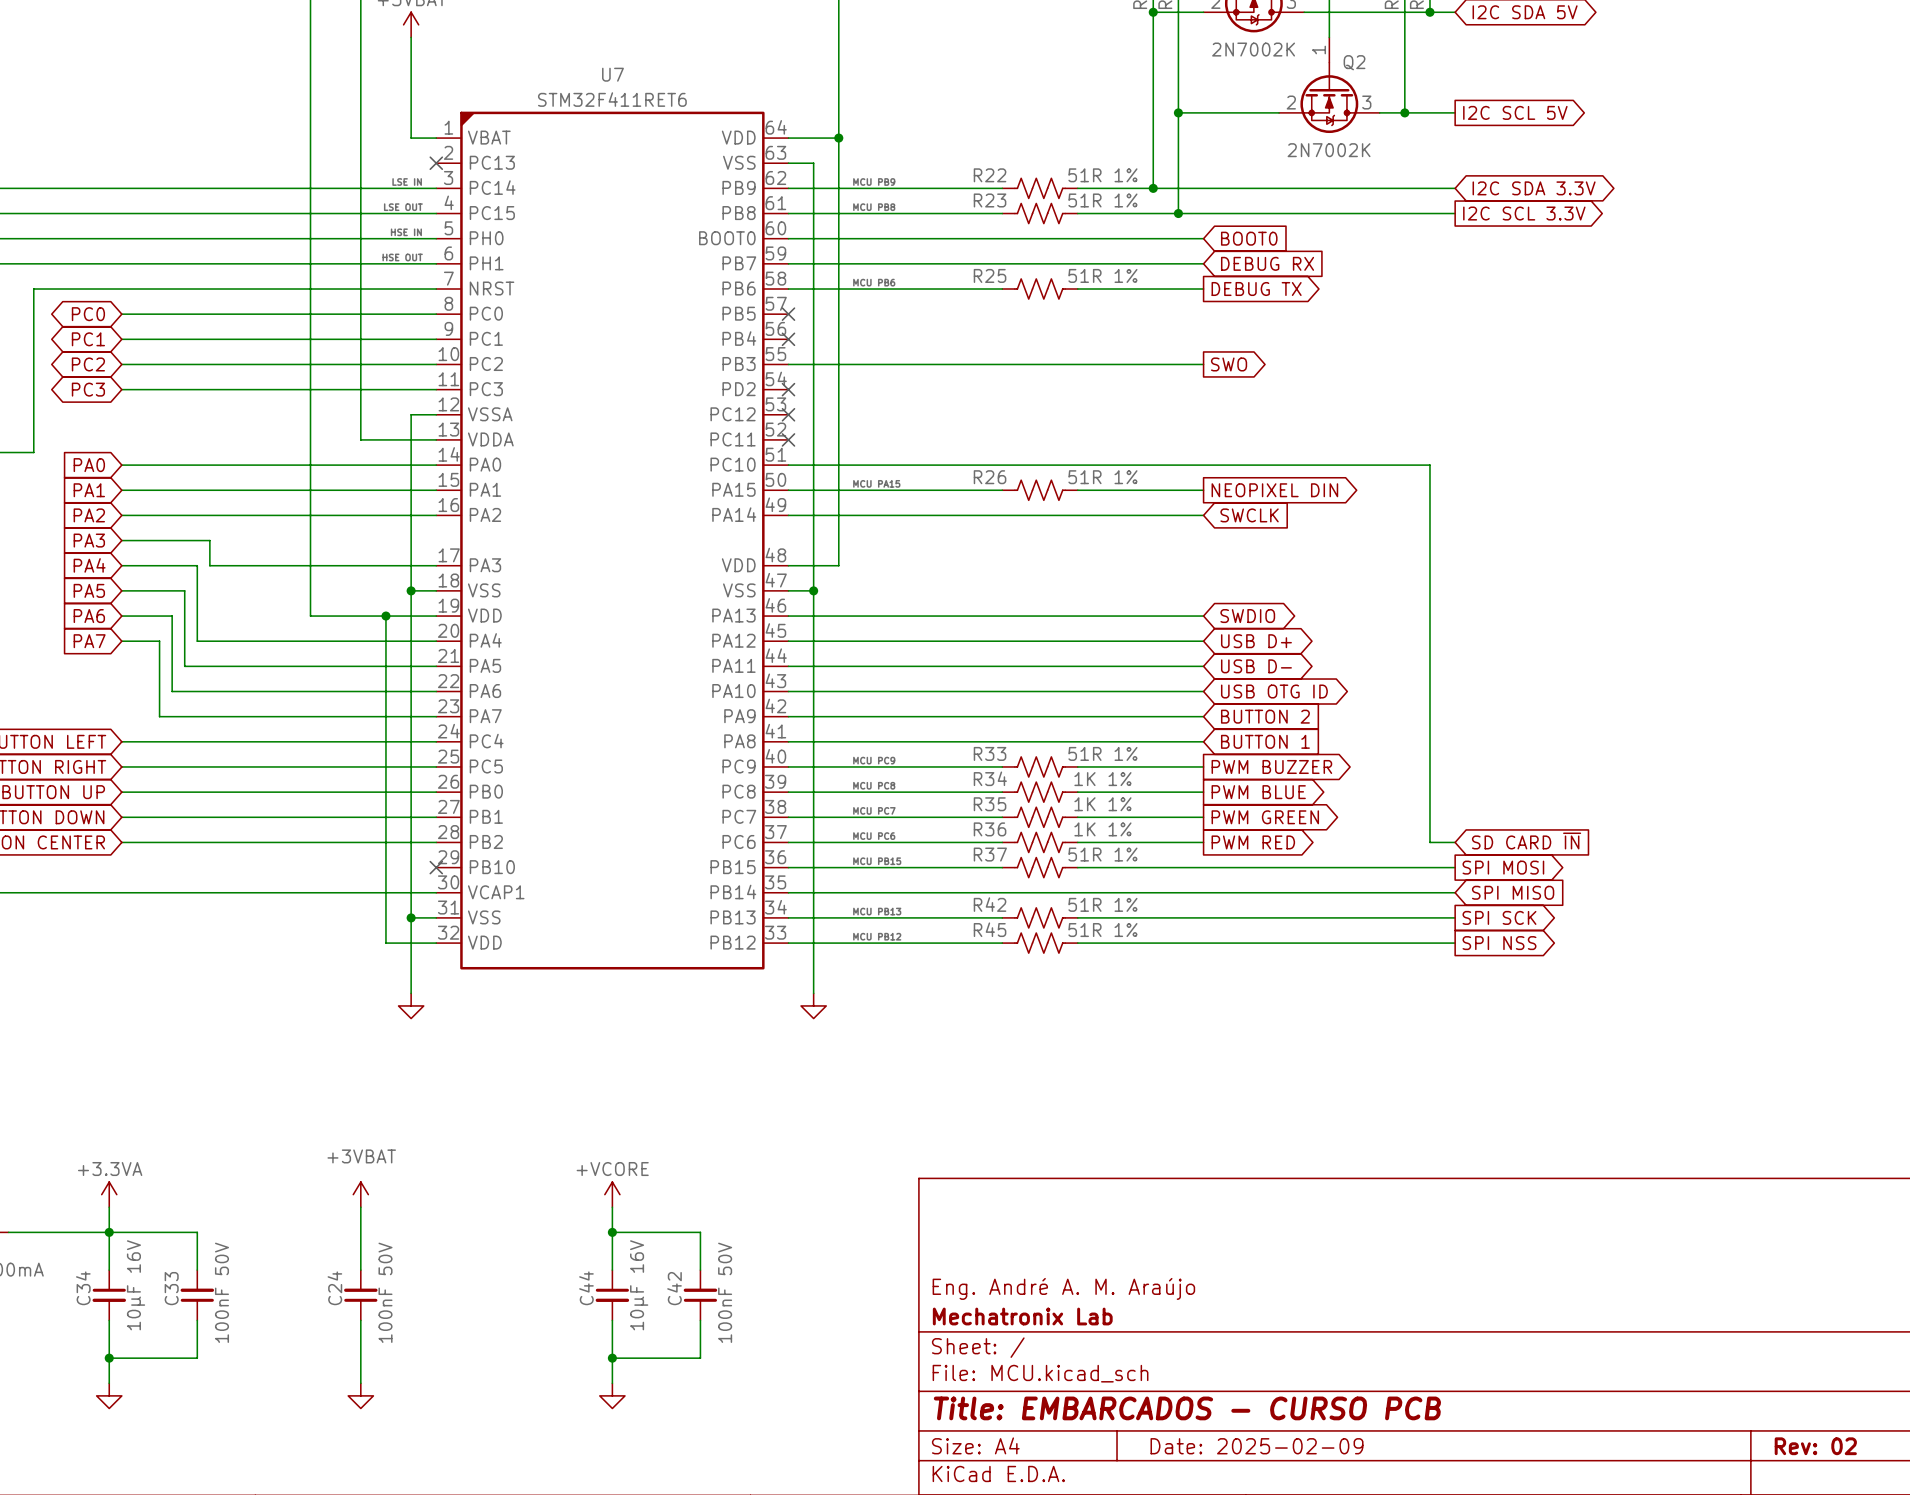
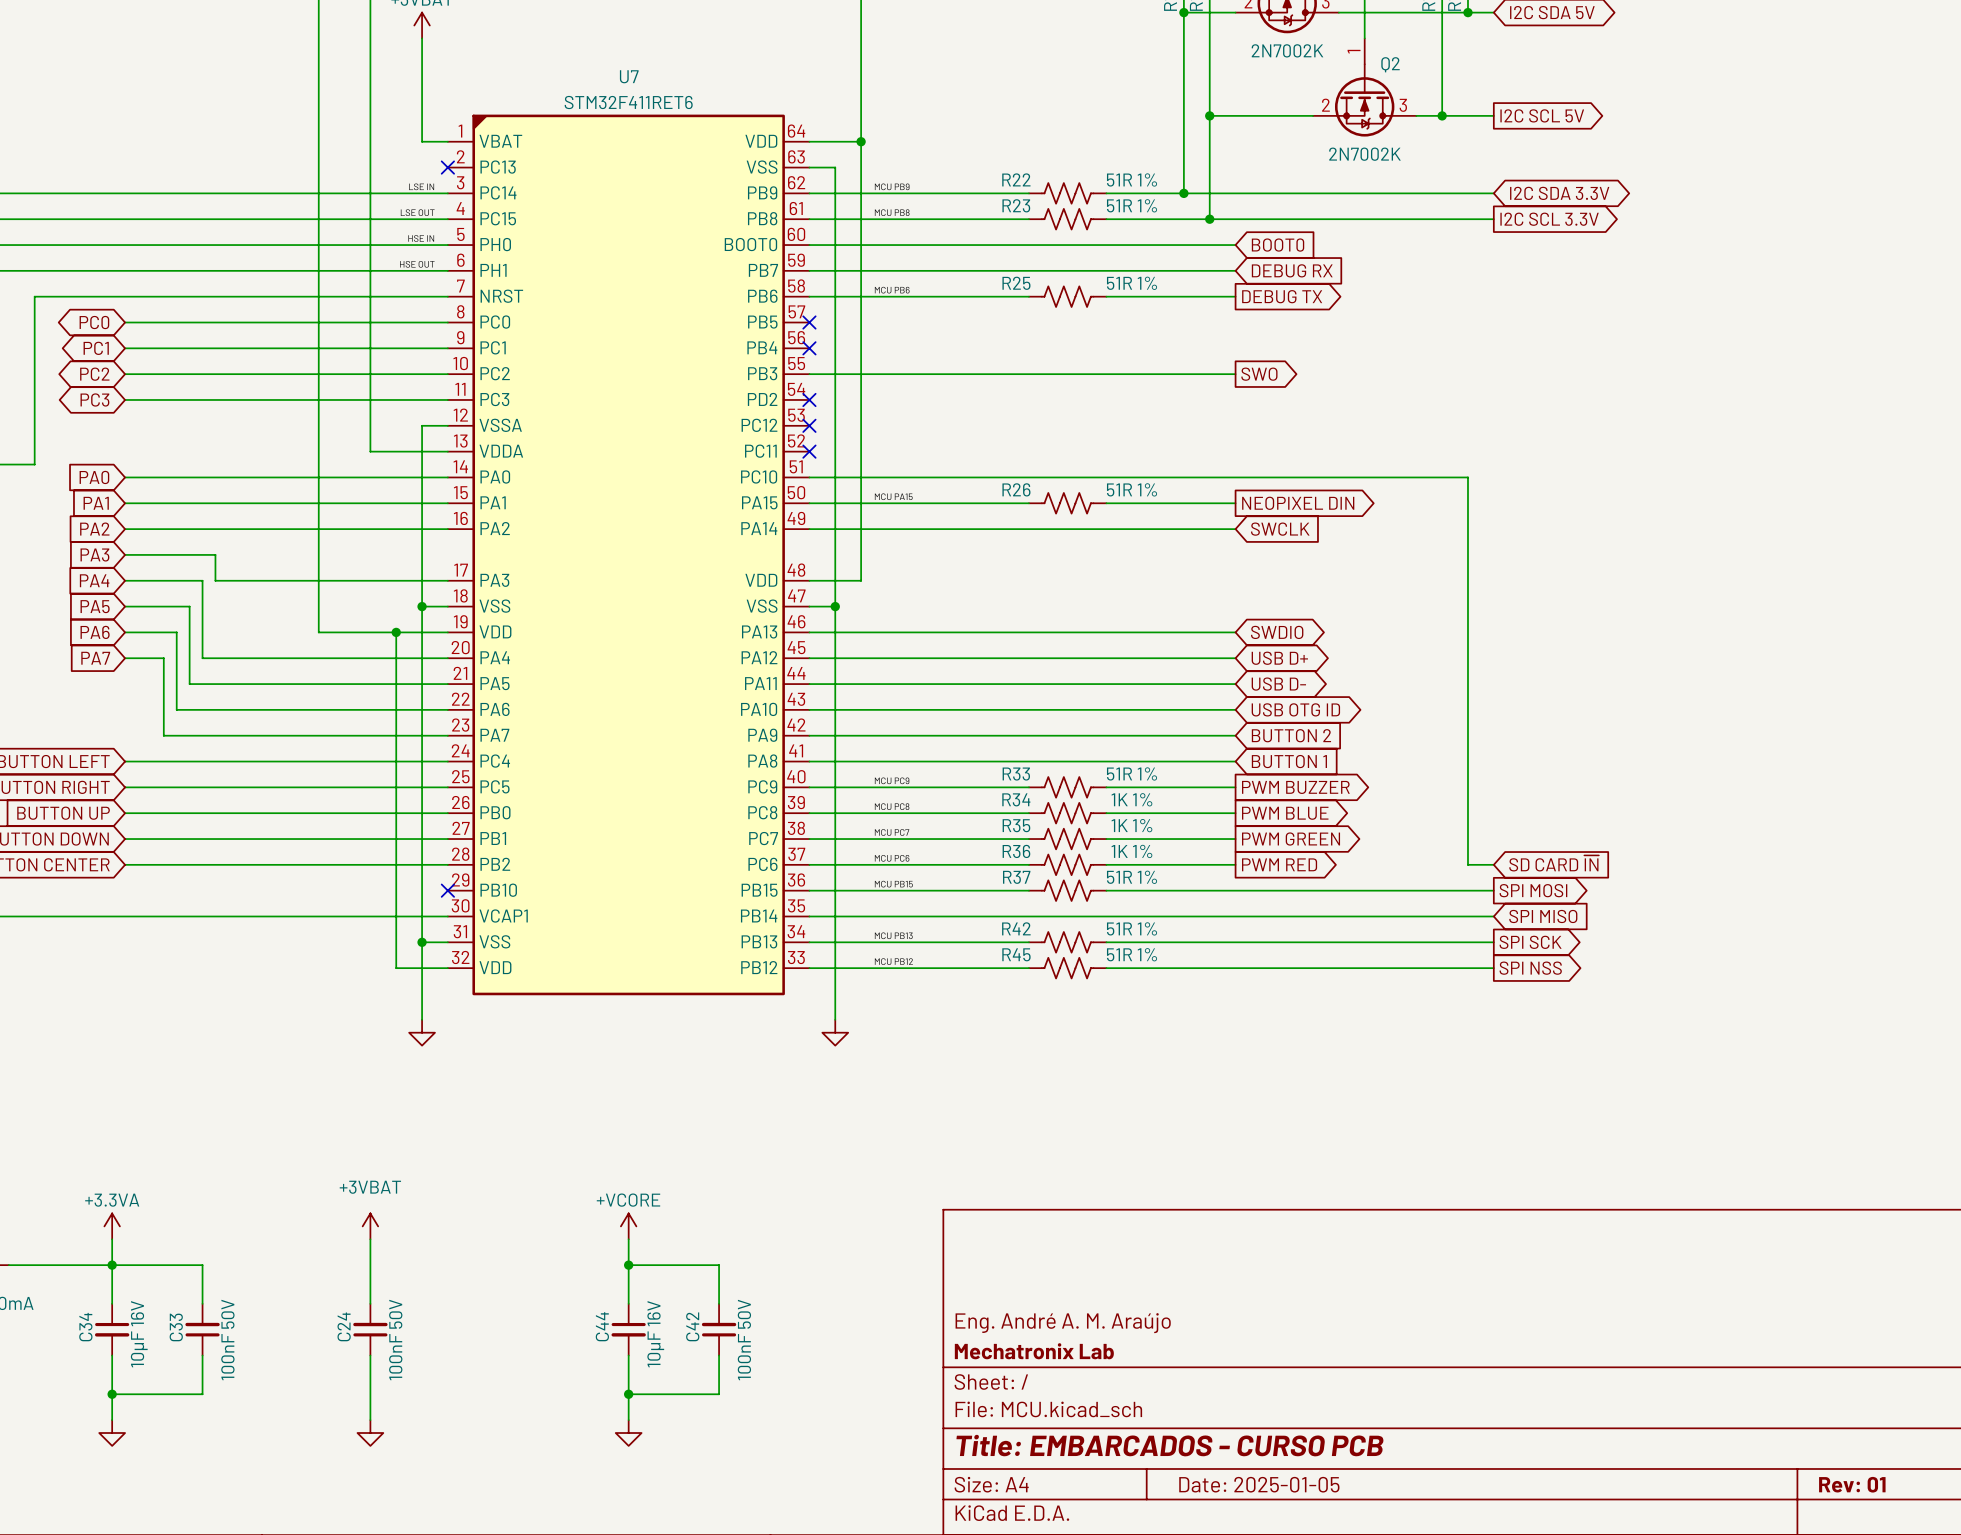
title block: Date: 2025-02-09 (1257, 1446) -> Date: 2025-01-05 (1259, 1484)
title block: Rev: 02 (1815, 1446) -> Rev: 01 (1852, 1484)

